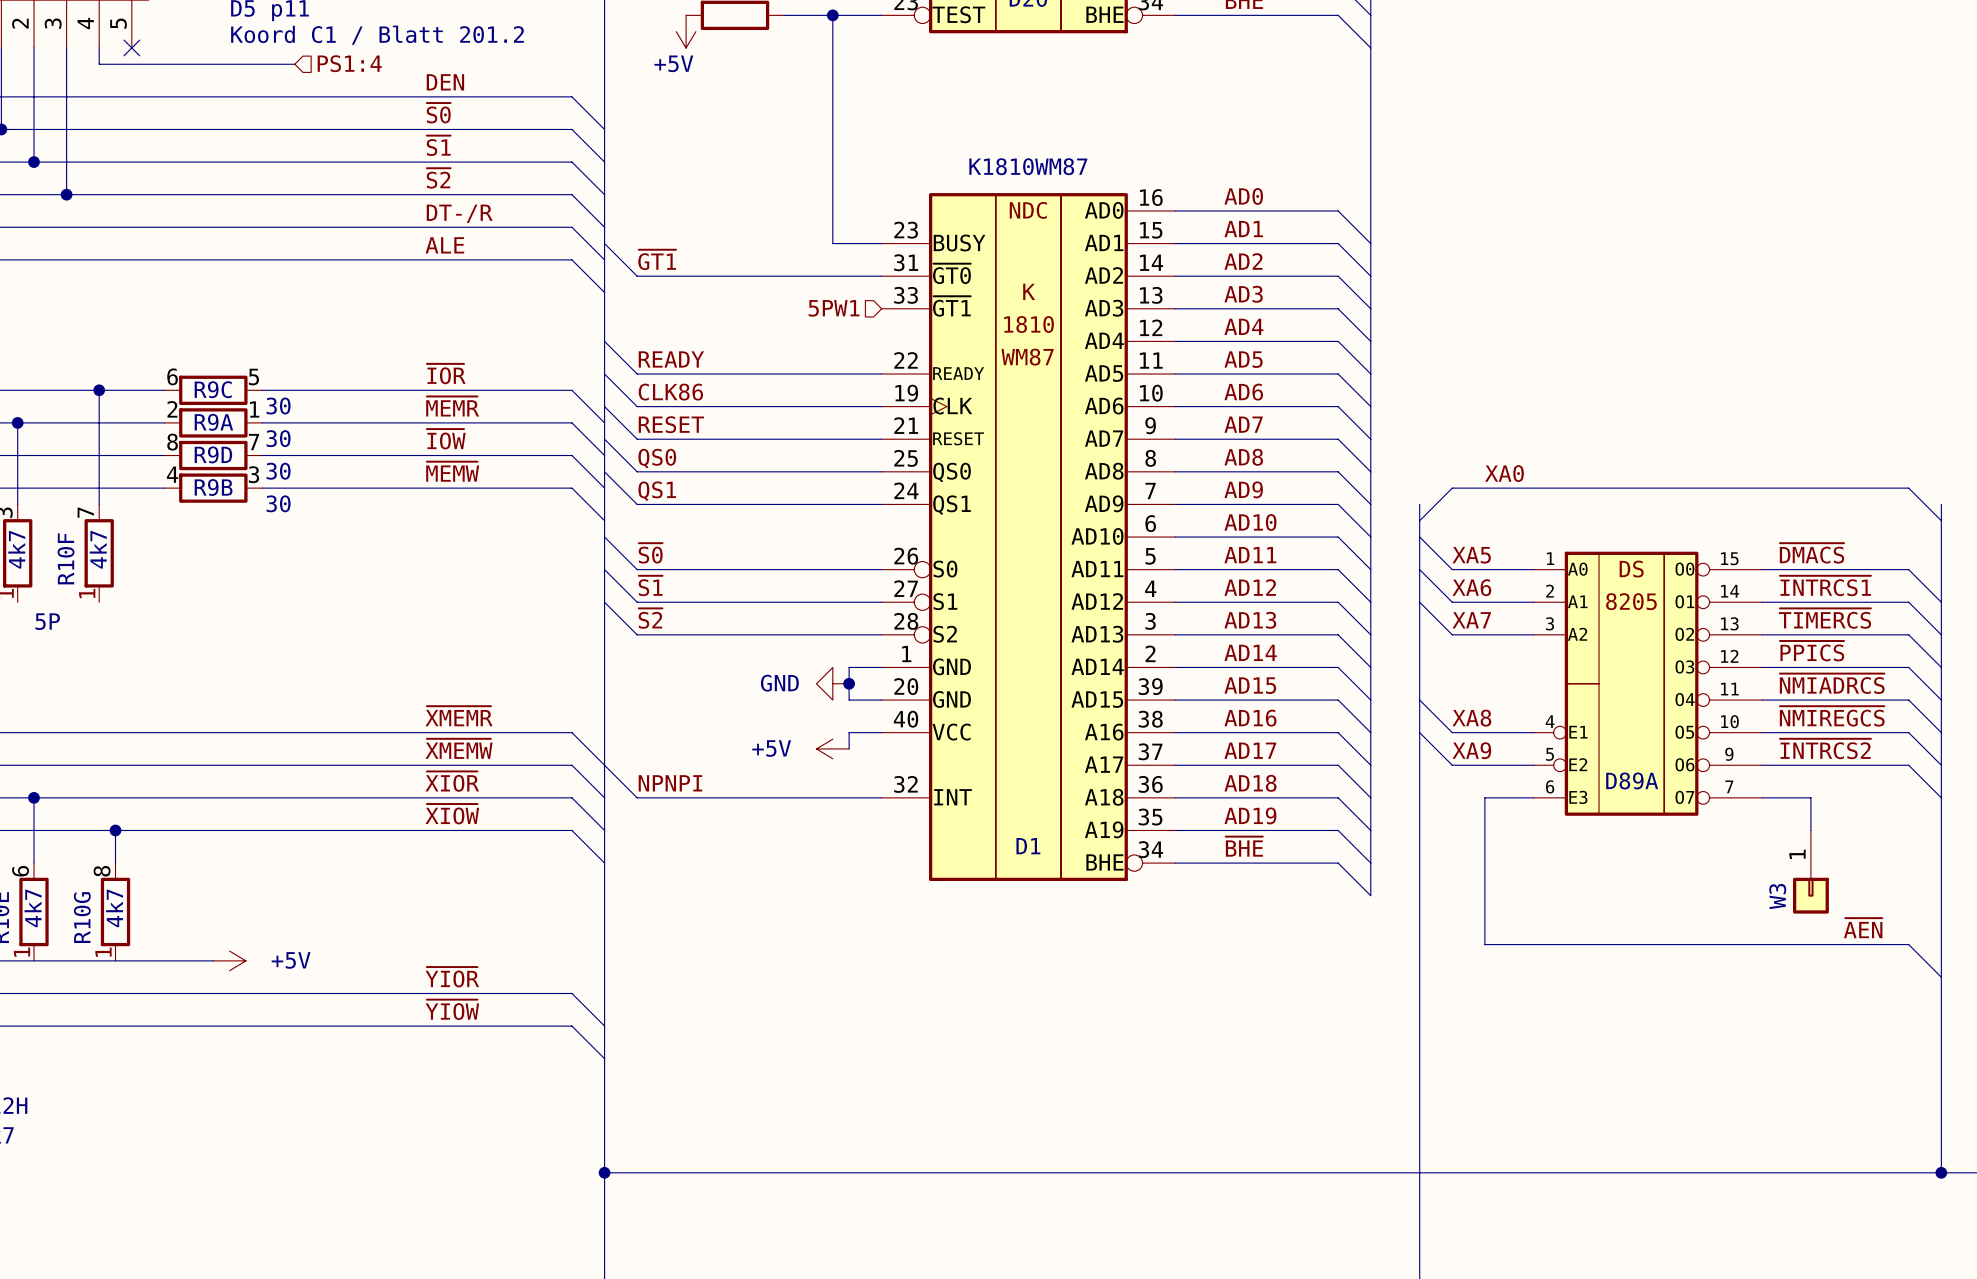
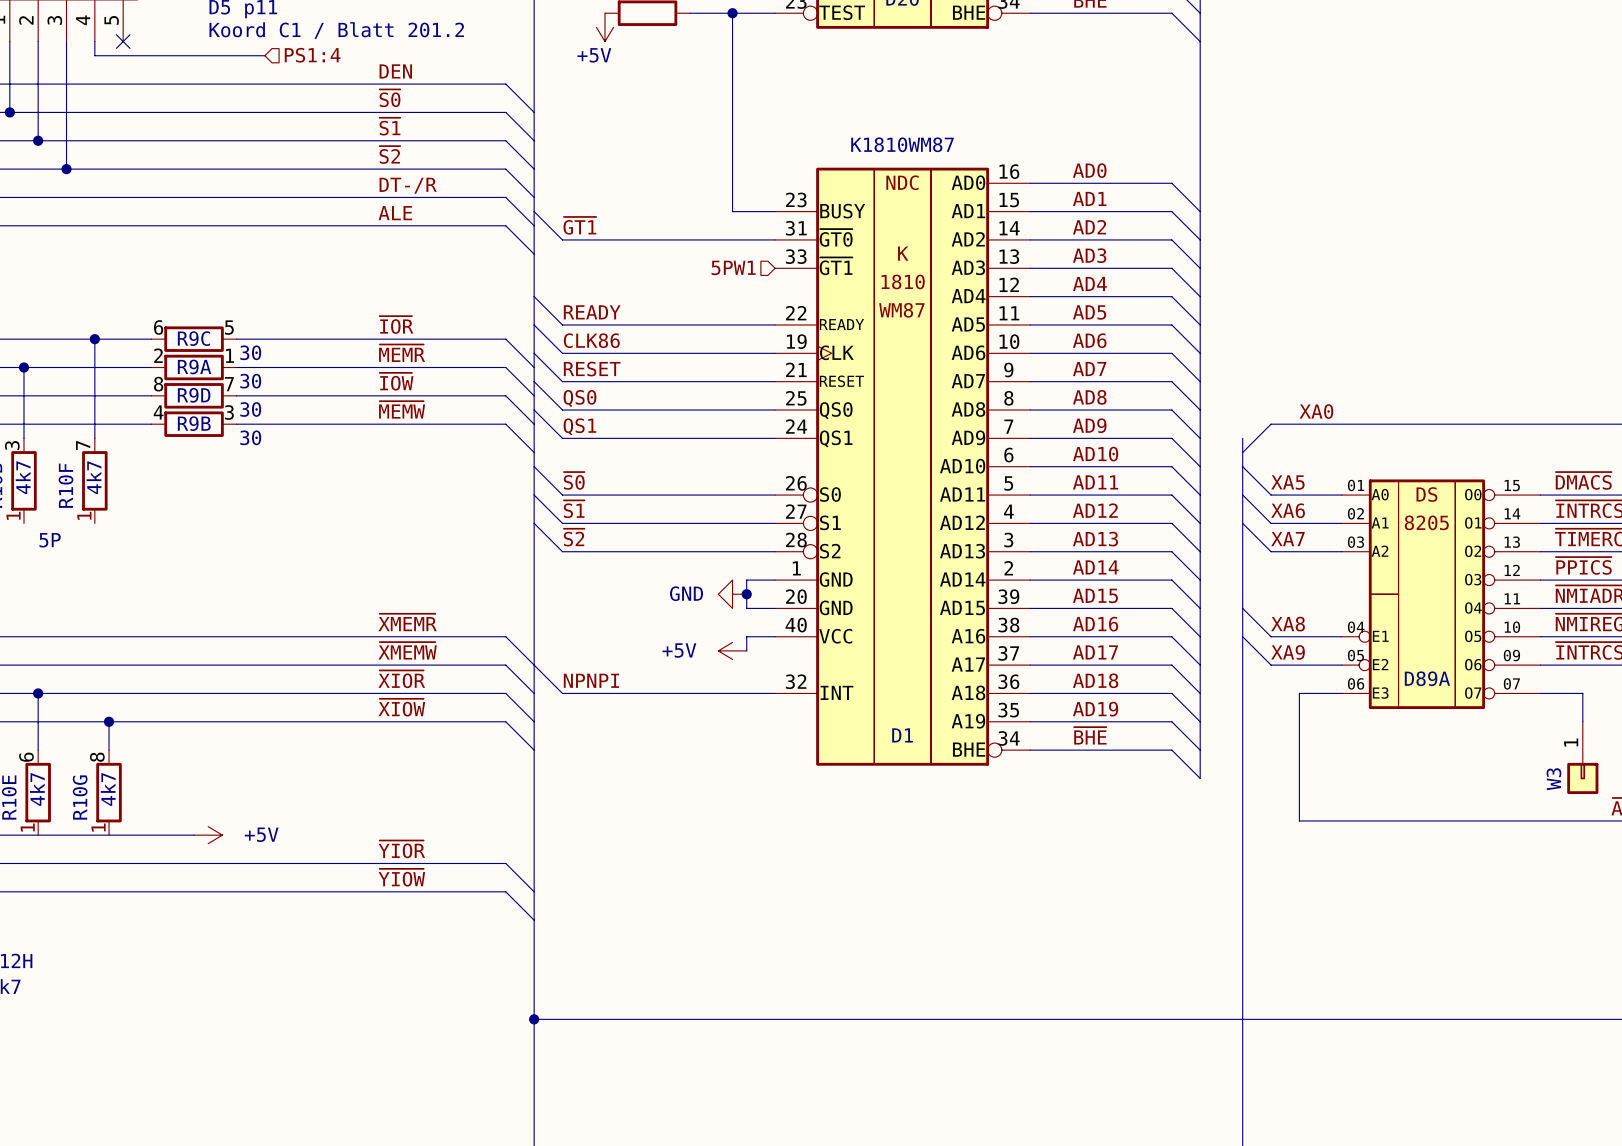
D89A pin number: 1 (1550, 558) -> 01 (1356, 485)
D89A pin number: 2 (1550, 591) -> 02 (1355, 513)
D89A pin number: 3 (1550, 623) -> 03 (1356, 542)
D89A pin number: 4 (1550, 721) -> 04 (1356, 627)
D89A pin number: 5 (1550, 754) -> 05 (1355, 655)
D89A pin number: 9 (1729, 754) -> 09 (1511, 655)
D89A pin number: 6 (1550, 786) -> 06 (1356, 683)
D89A pin number: 7 (1729, 786) -> 07 (1511, 683)

